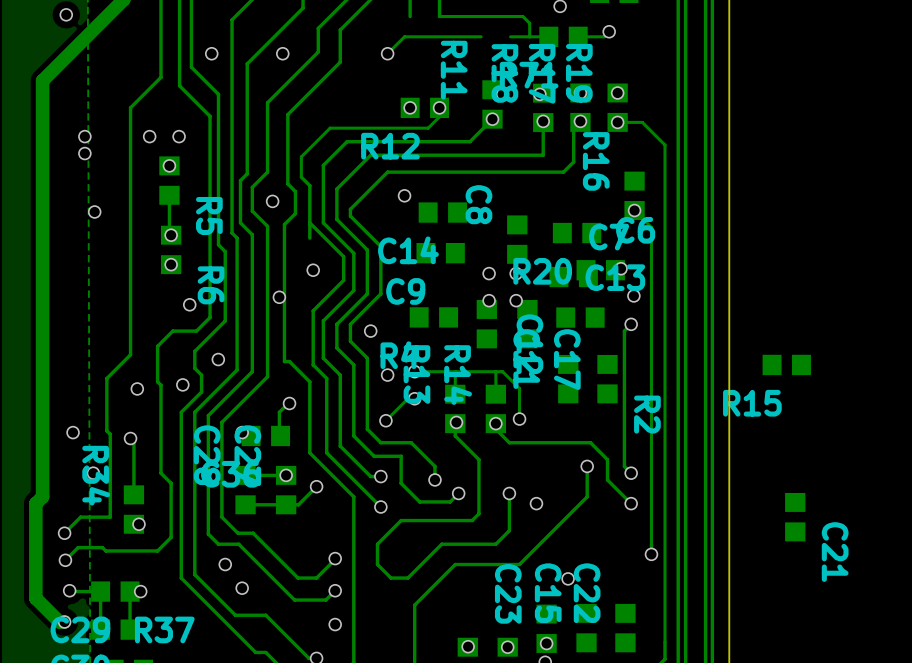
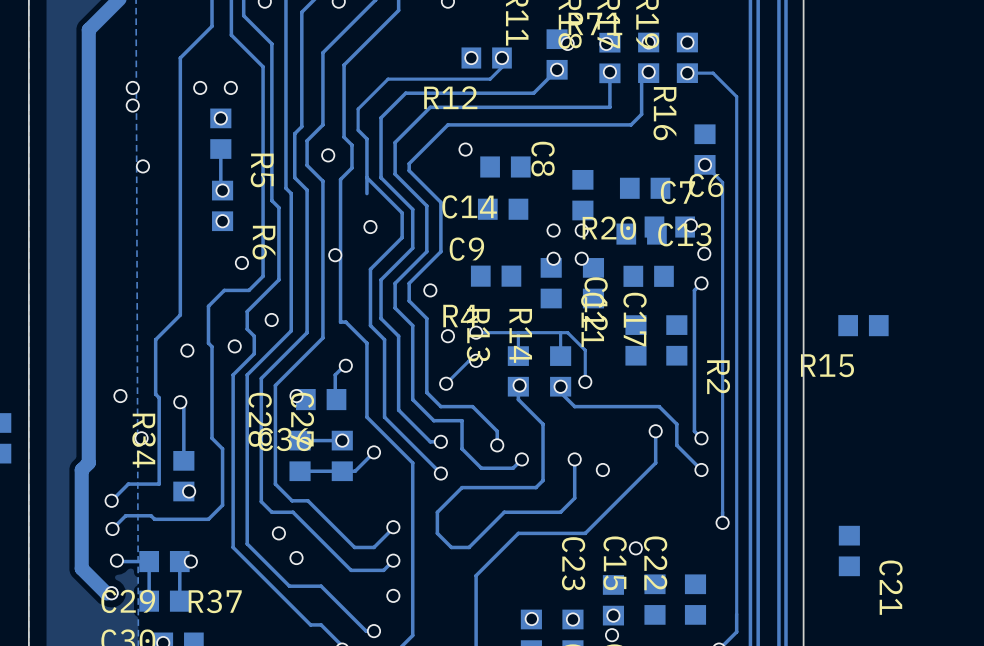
C21 position: (795, 517) -> (849, 550)

